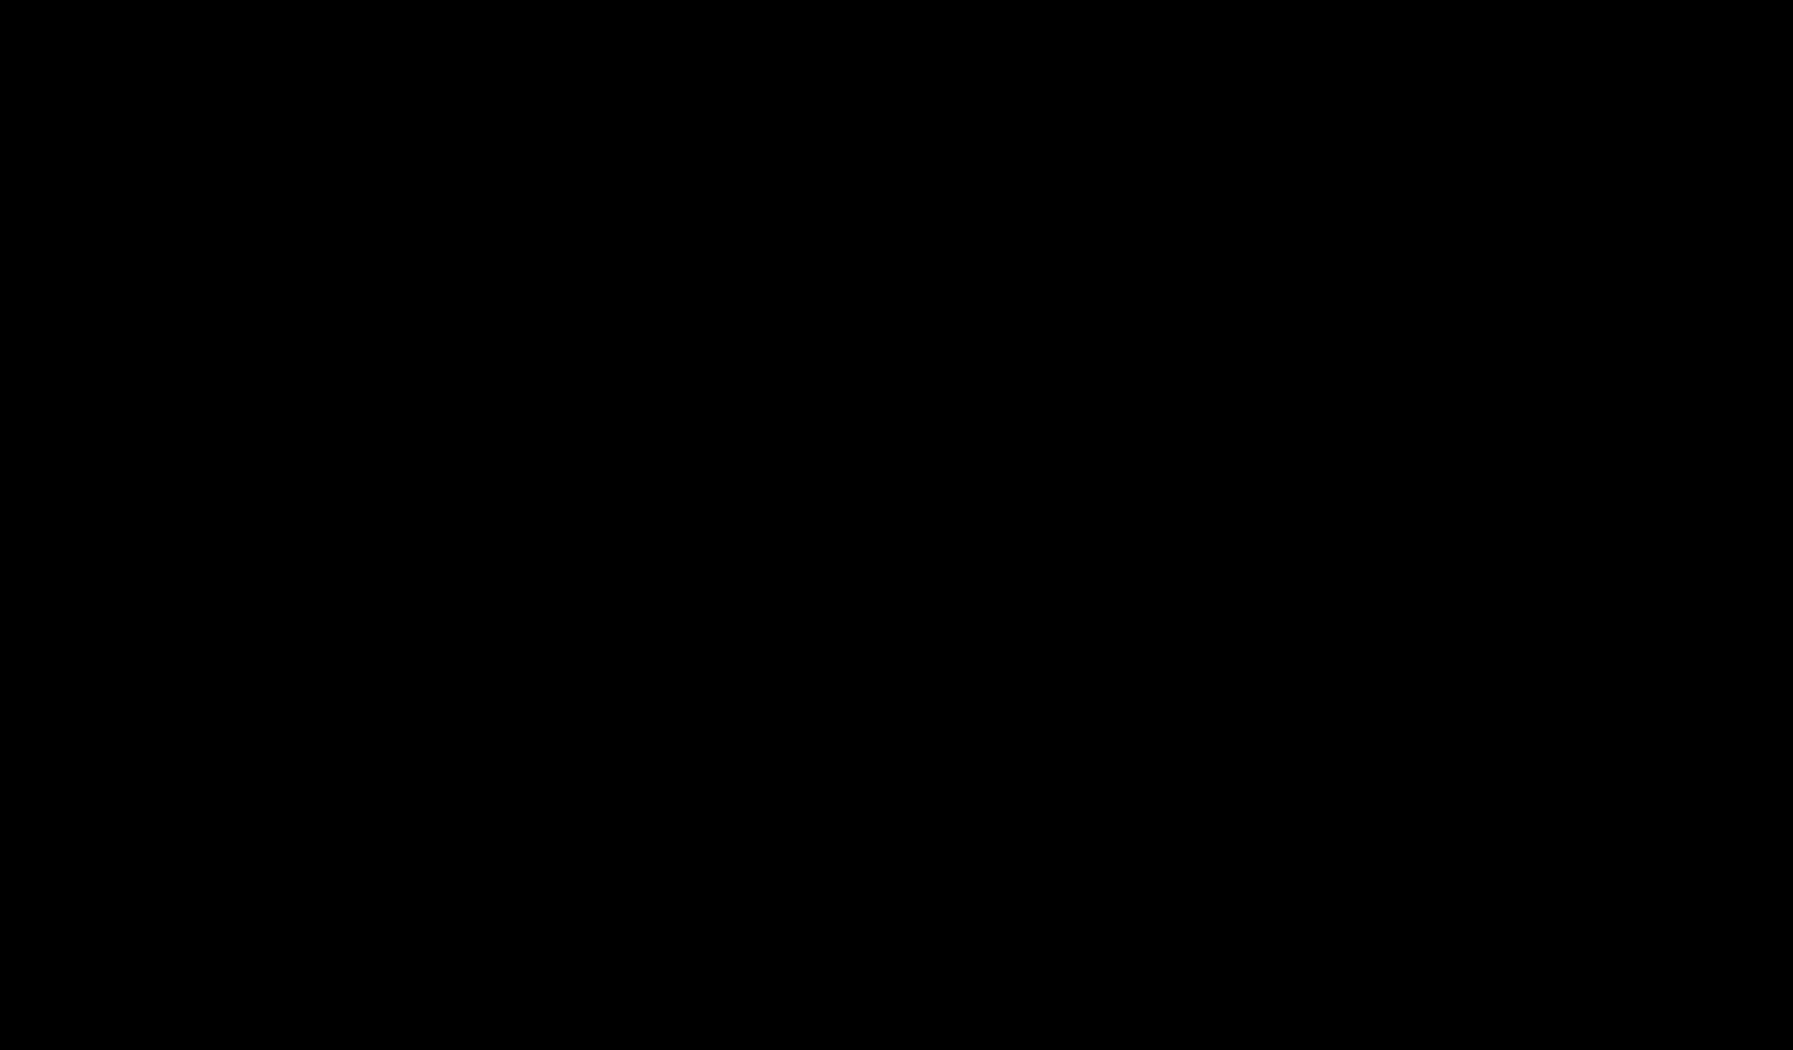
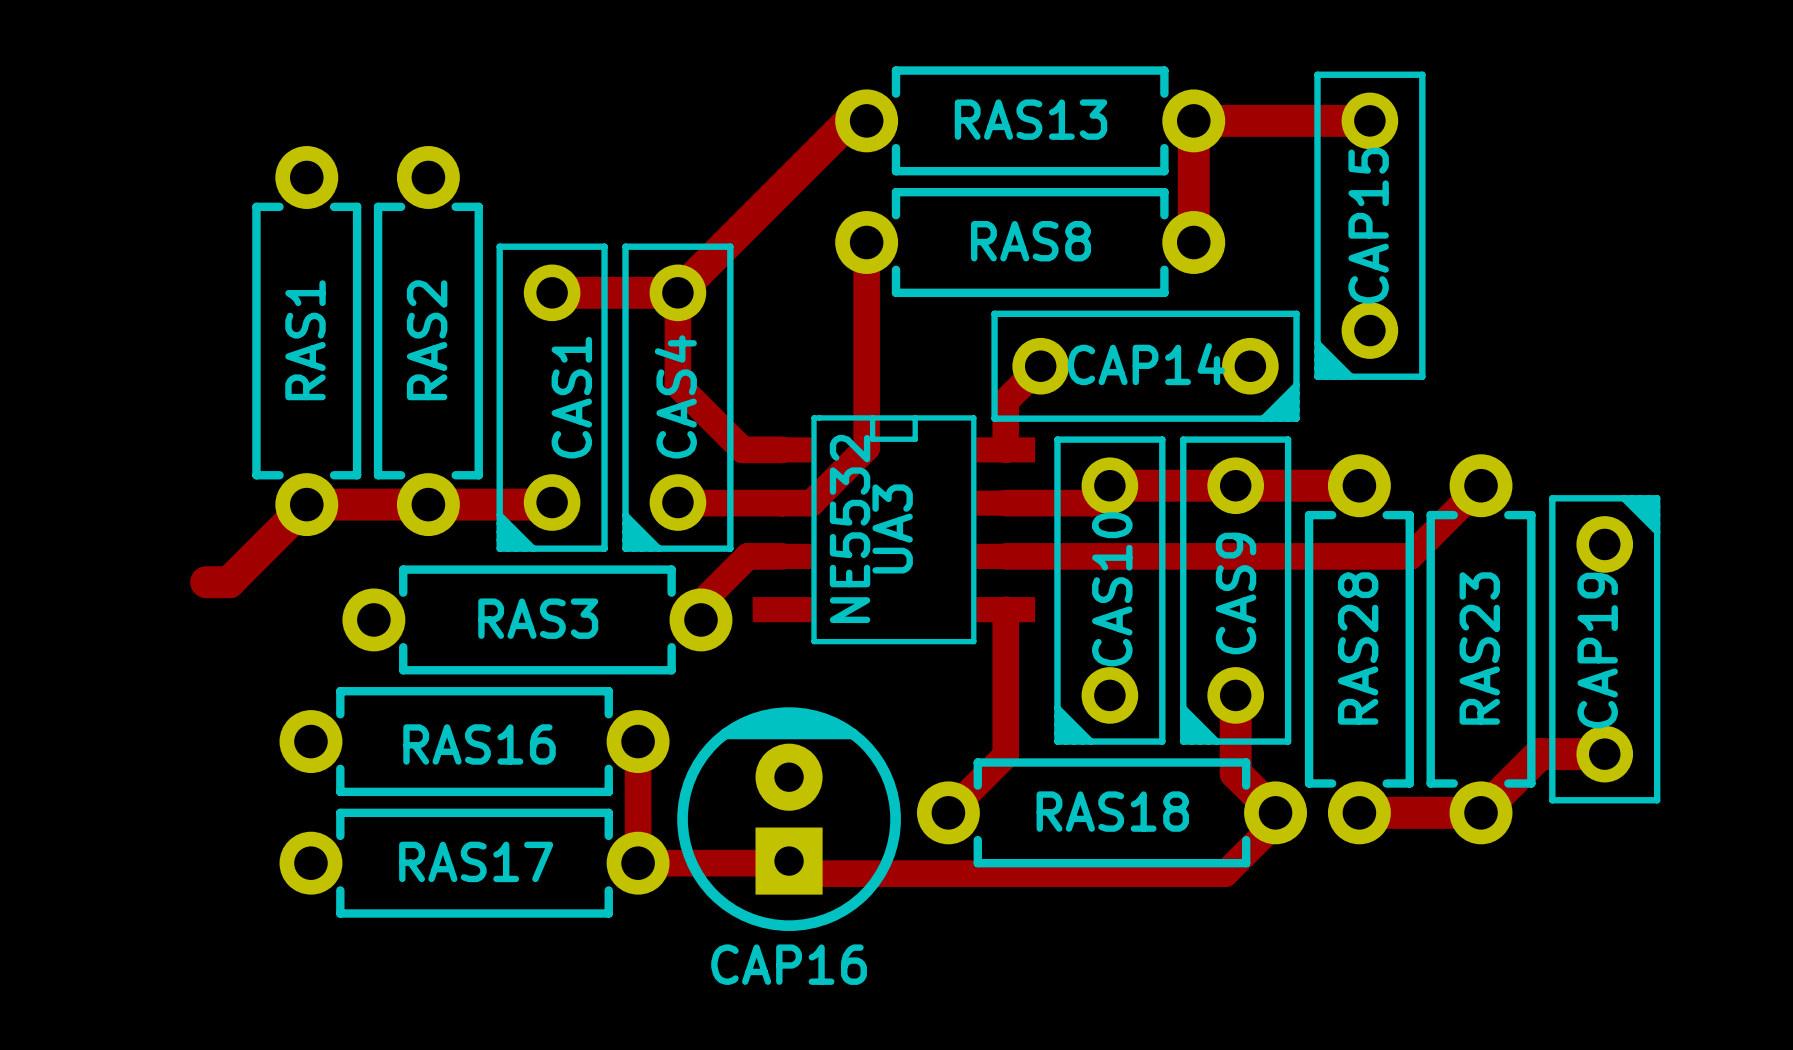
track: none -> (866, 120) (849, 120) (677, 292)
RAS13: none -> (1030, 120)
track: none -> (1369, 120) (1193, 120) (1193, 242)
CAP15: none -> (1369, 225)
track: none -> (866, 242) (866, 448) (811, 503) (677, 502)
RAS8: none -> (1030, 242)
track: none -> (552, 292) (677, 292)
track: none -> (677, 292) (677, 385) (742, 449) (782, 449)
RAS1: none -> (306, 341)
RAS2: none -> (428, 341)
track: none -> (1040, 366) (1005, 401) (1005, 449)
CAP14: none -> (1145, 366)
CAS1: none -> (552, 397)
CAS4: none -> (677, 397)
track: none -> (1359, 485) (1109, 485) (1092, 503) (1005, 503)
track: none -> (1481, 485) (1410, 556) (1005, 556)
track: none -> (552, 502) (550, 504) (306, 504) (229, 582) (206, 582)
UA3: none -> NE5532 (893, 529)
track: none -> (782, 556) (747, 556) (700, 603) (700, 619)
CAS10: none -> (1109, 590)
CAS9: none -> (1235, 590)
track: none -> (1005, 609) (1005, 755) (948, 812)
RAS3: none -> (537, 619)
RAS28: none -> (1359, 649)
RAS23: none -> (1481, 649)
CAP19: none -> (1604, 649)
track: none -> (1235, 695) (1235, 773) (1275, 812) (1275, 823) (1225, 873) (801, 873) (789, 861) (786, 863) (638, 863) (638, 741)
RAS16: none -> (474, 741)
track: none -> (1604, 754) (1539, 754) (1481, 812) (1359, 812)
RAS18: none -> (1111, 812)
CAP16: none -> (789, 819)
RAS17: none -> (474, 863)

